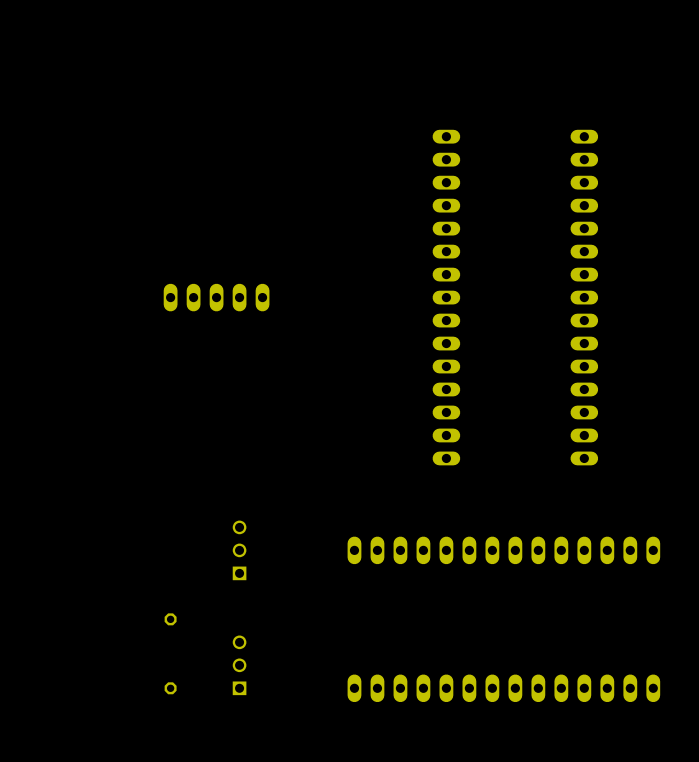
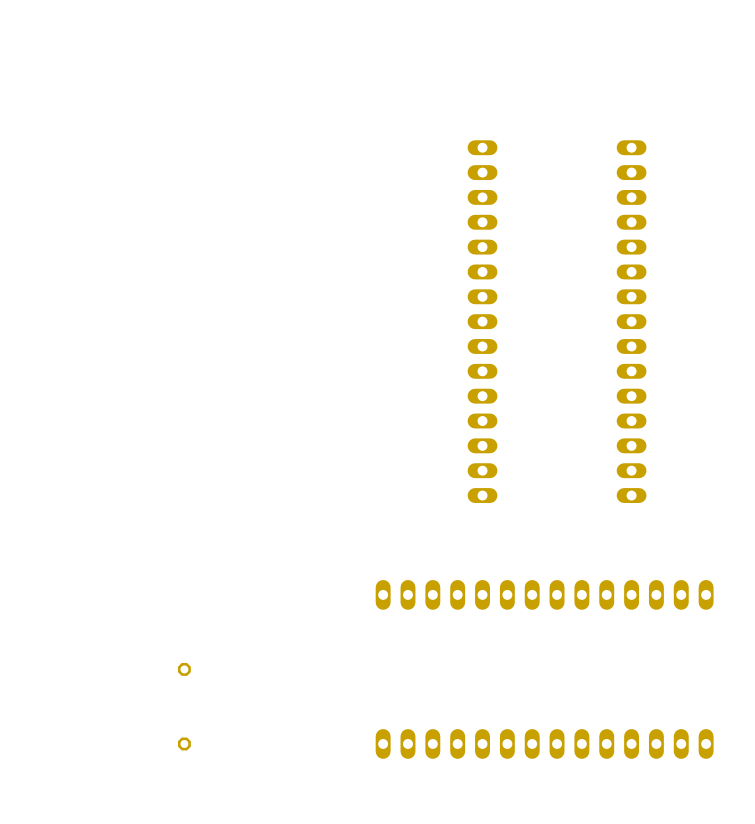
part: (216, 297) -> none
part: (239, 550) -> none
part: (239, 665) -> none

